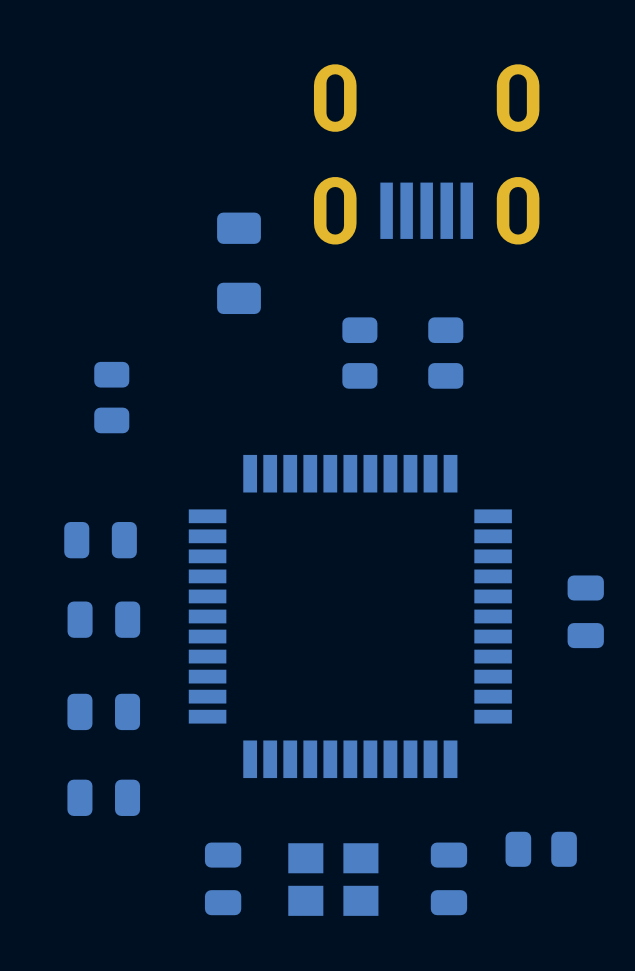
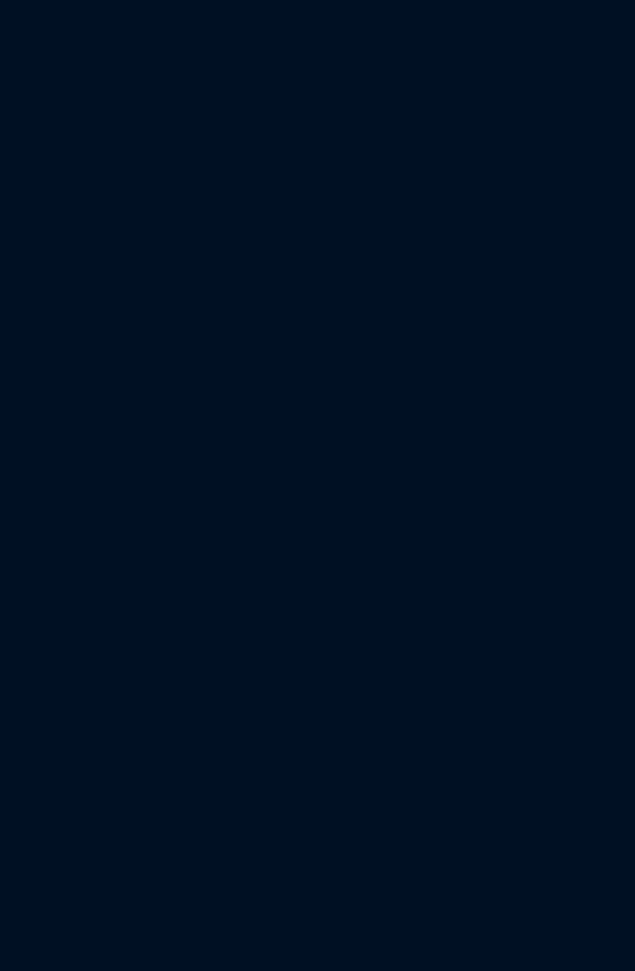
part: (426, 154) -> none
part: (239, 263) -> none
part: (359, 353) -> none
part: (445, 353) -> none
part: (111, 397) -> none
part: (100, 540) -> none
part: (585, 611) -> none
part: (350, 616) -> none
part: (103, 619) -> none
part: (103, 711) -> none
part: (103, 797) -> none
part: (541, 849) -> none
part: (223, 878) -> none
part: (448, 878) -> none
part: (333, 879) -> none

